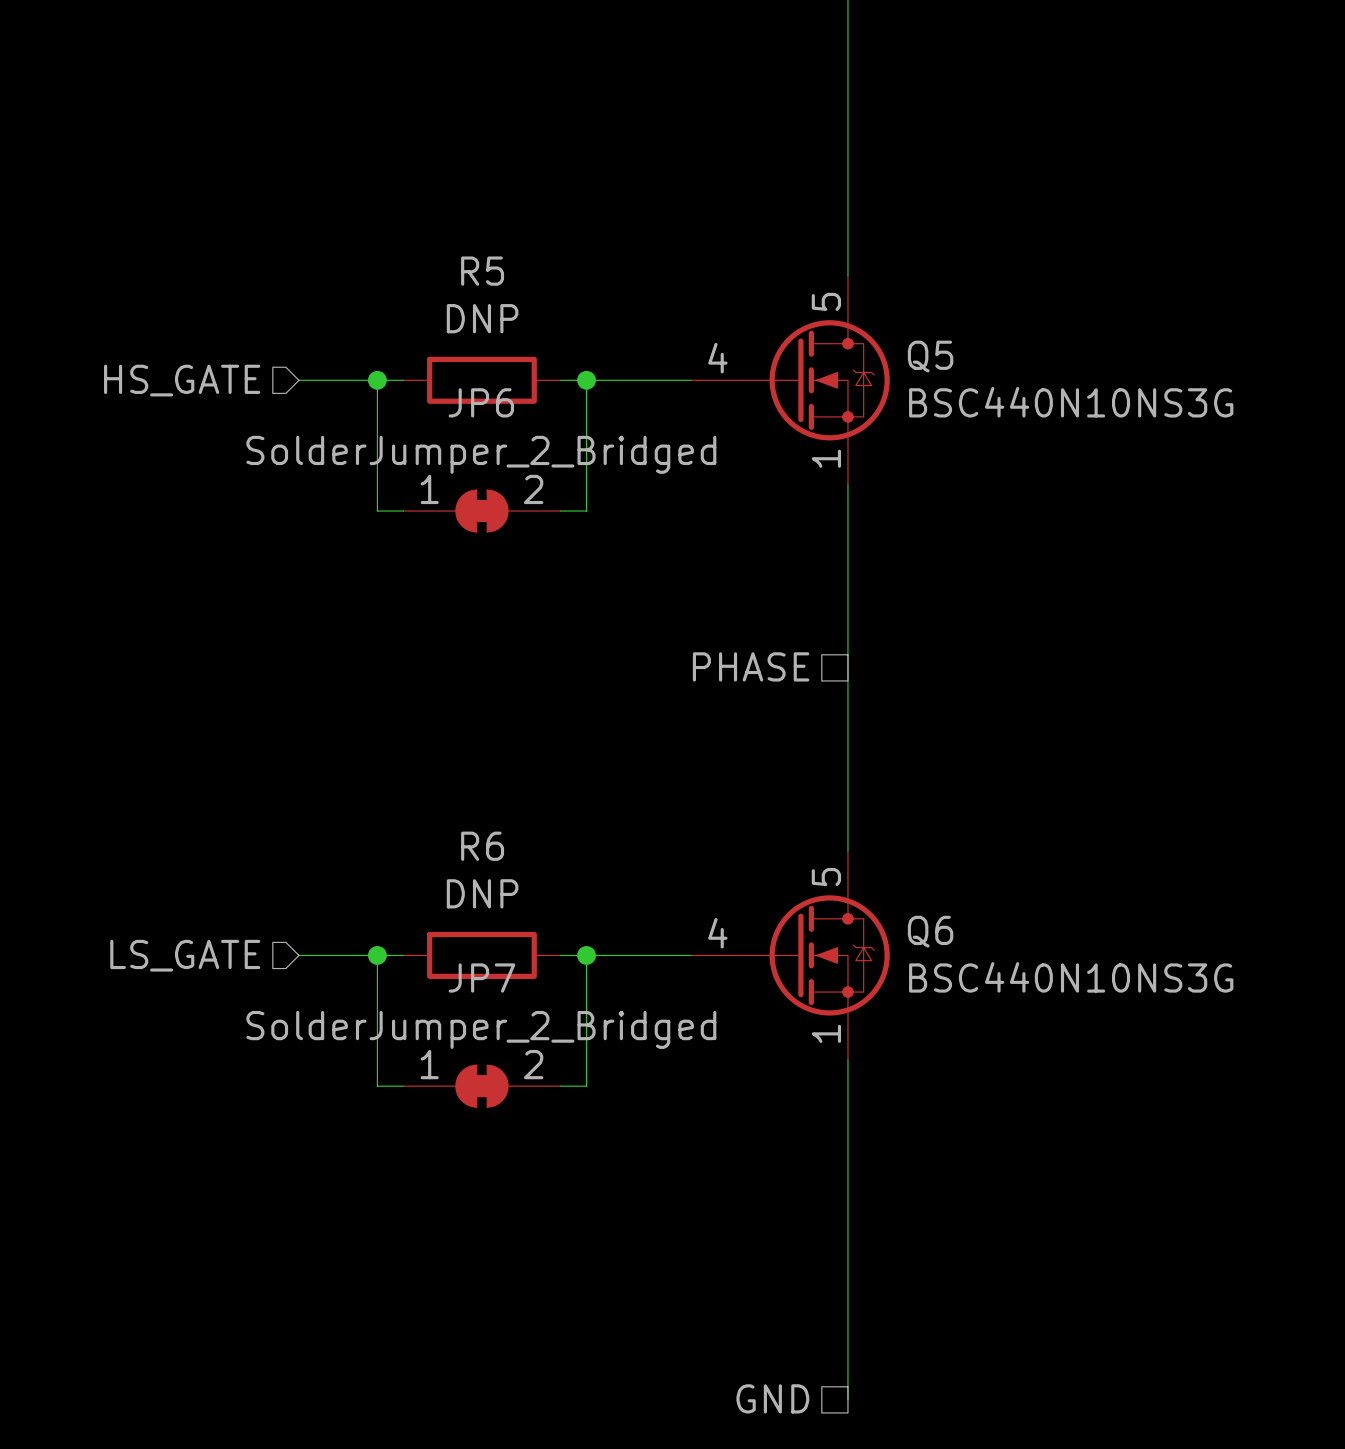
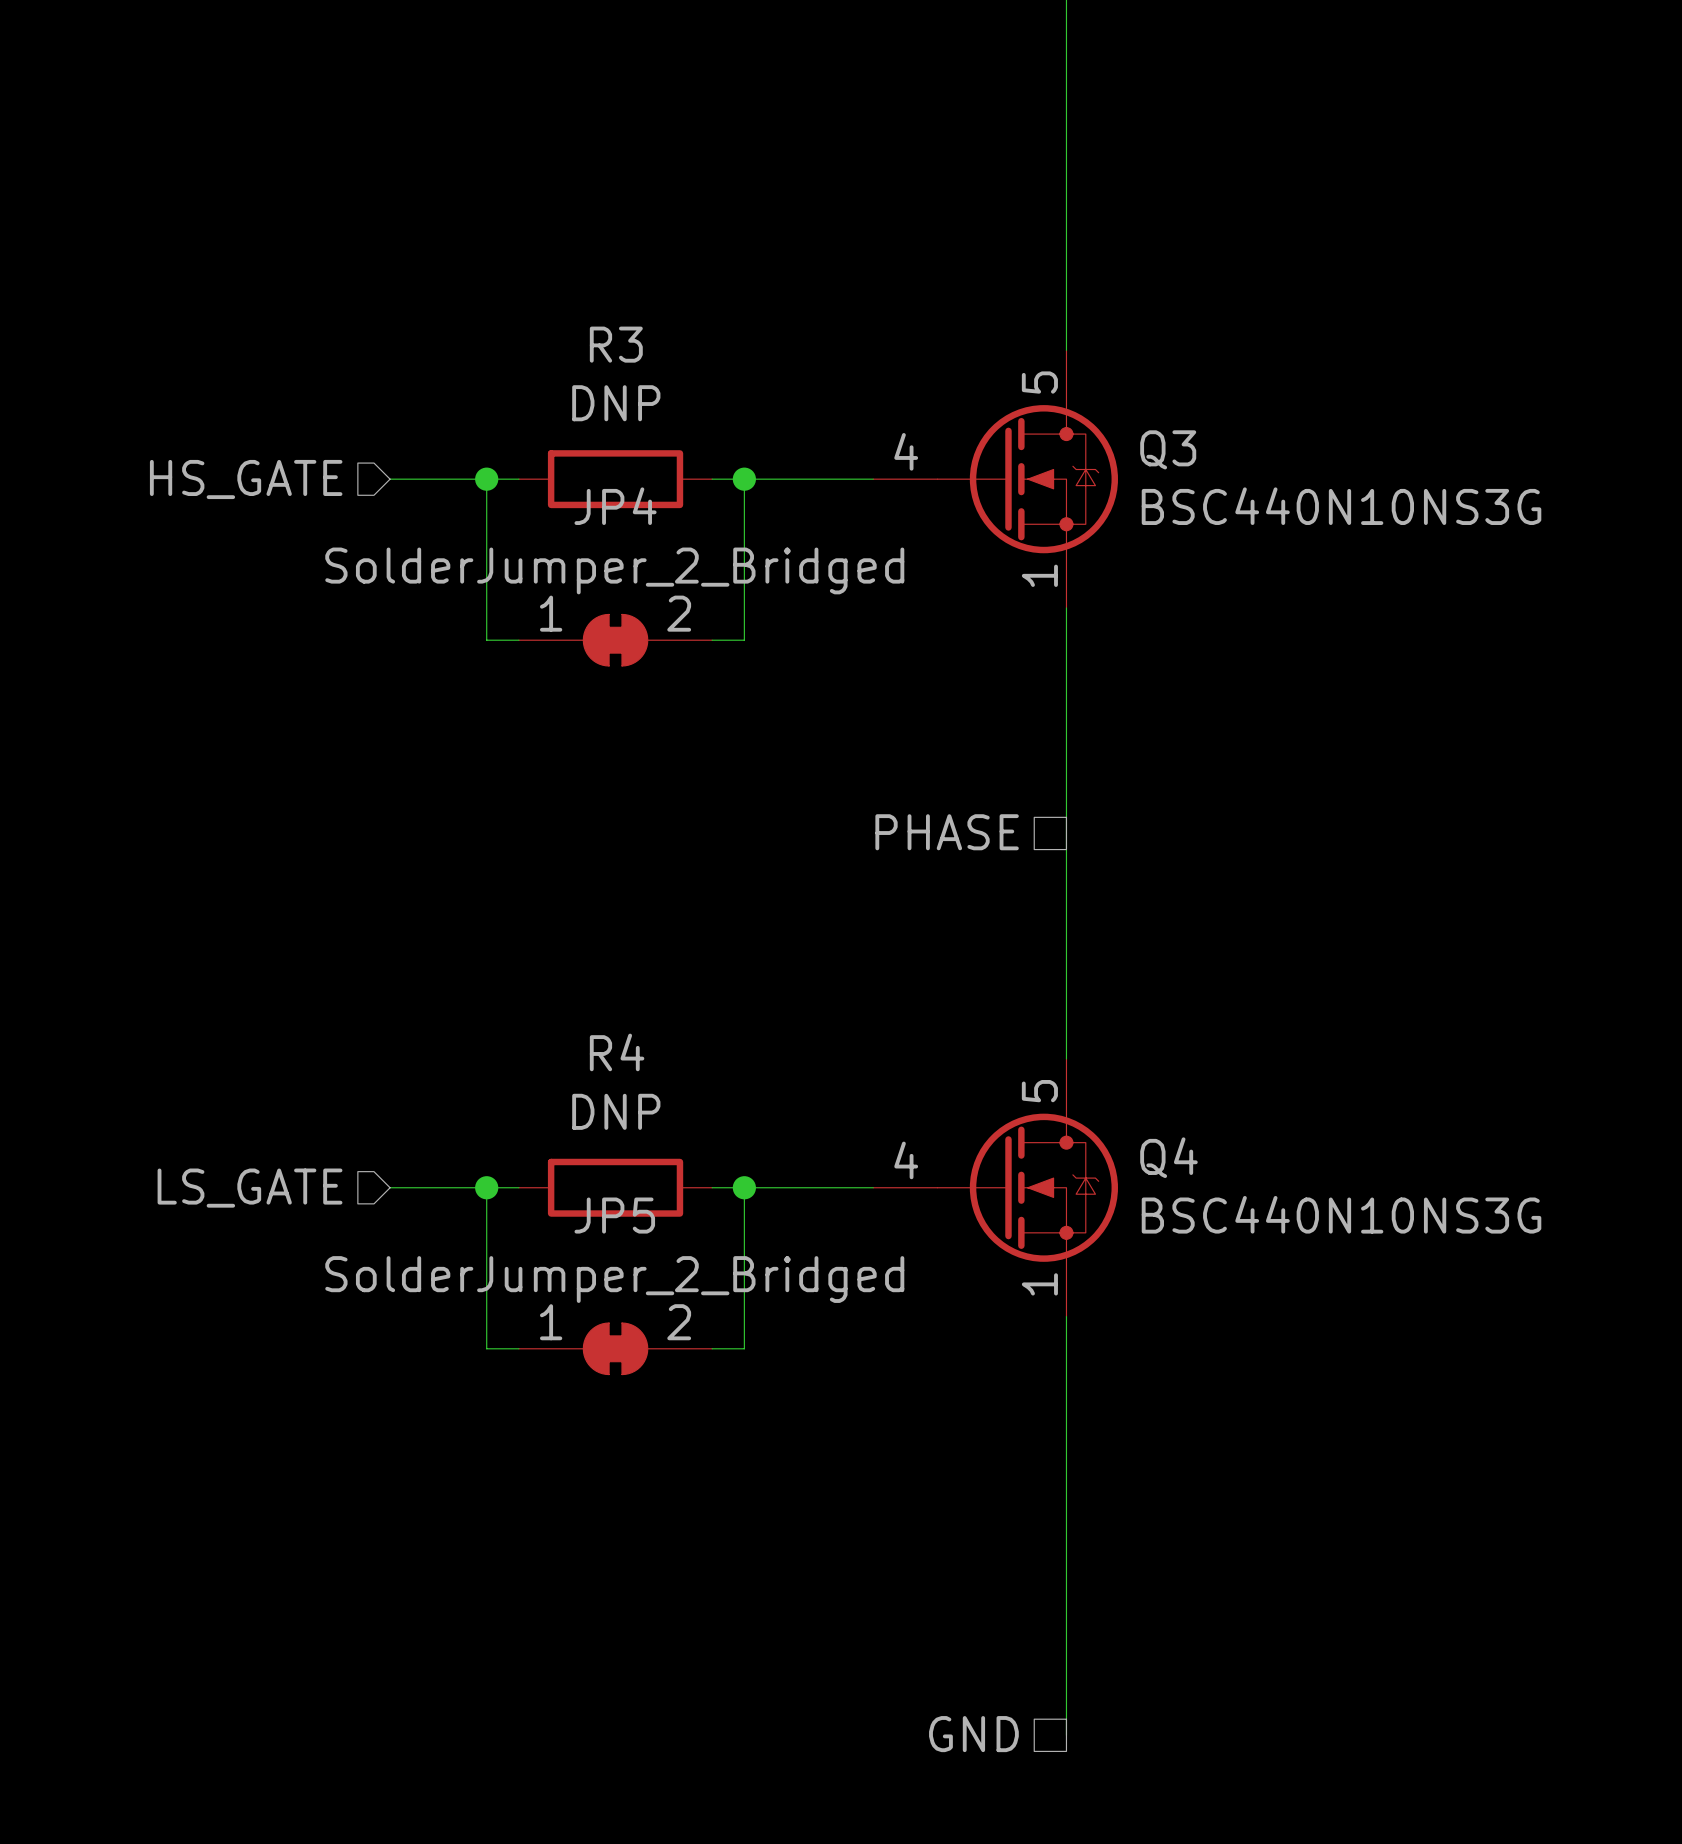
R5 name: R5 (482, 271) -> R3 (616, 344)
Q5 name: Q5 (930, 356) -> Q3 (1168, 449)
JP6 name: JP6 (481, 402) -> JP4 (615, 506)
R6 name: R6 (482, 846) -> R4 (617, 1052)
Q6 name: Q6 (930, 931) -> Q4 (1168, 1157)
JP7 name: JP7 (481, 978) -> JP5 (614, 1215)

